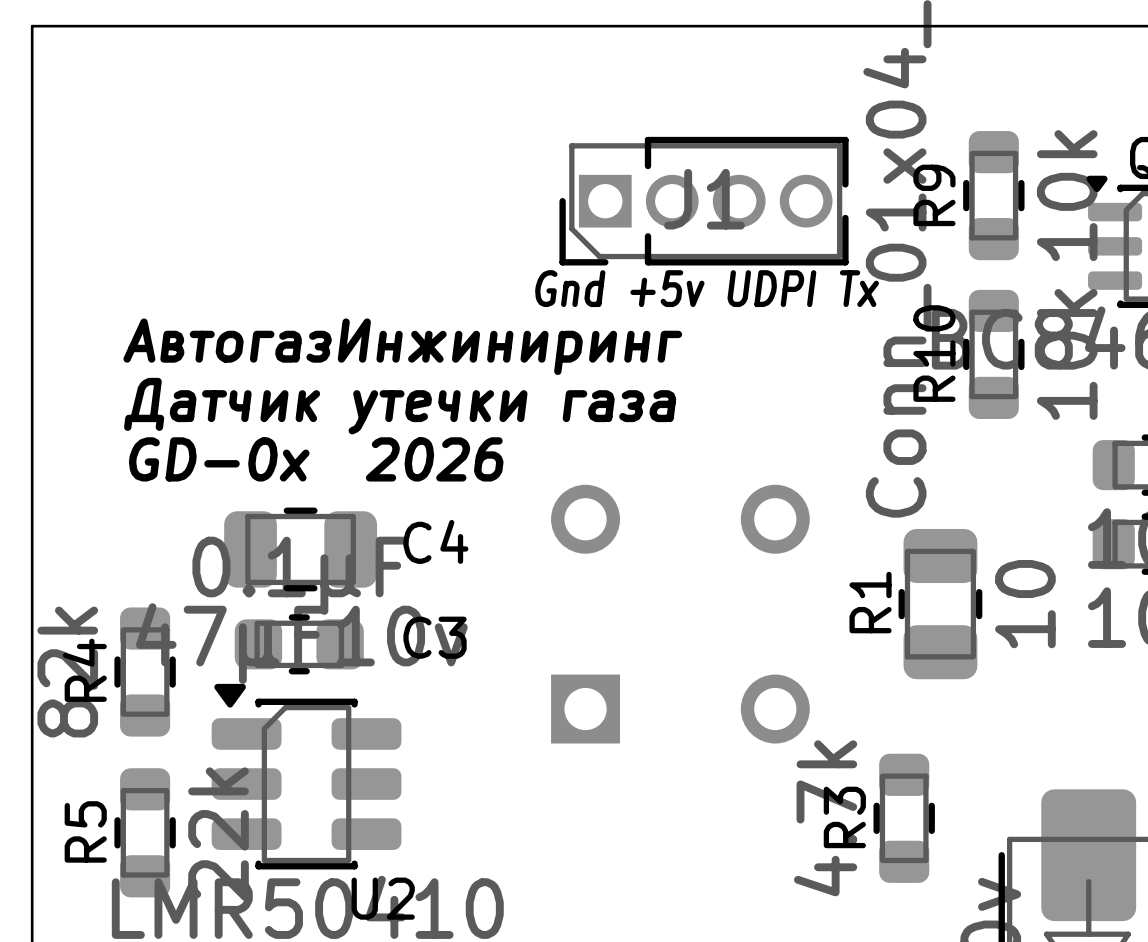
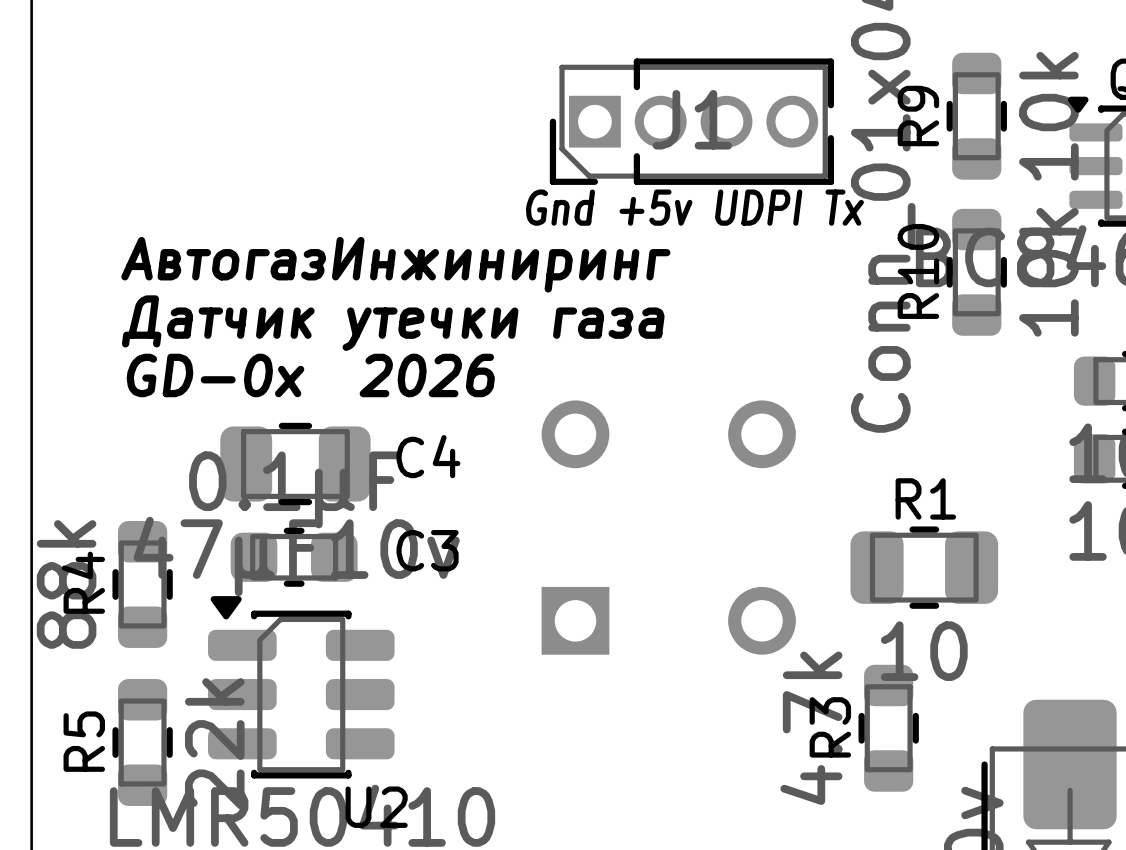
R1 rotation: 0° (940, 604) -> 90° clockwise (924, 567)
R4 value: 82k (67, 672) -> 88k (66, 584)

